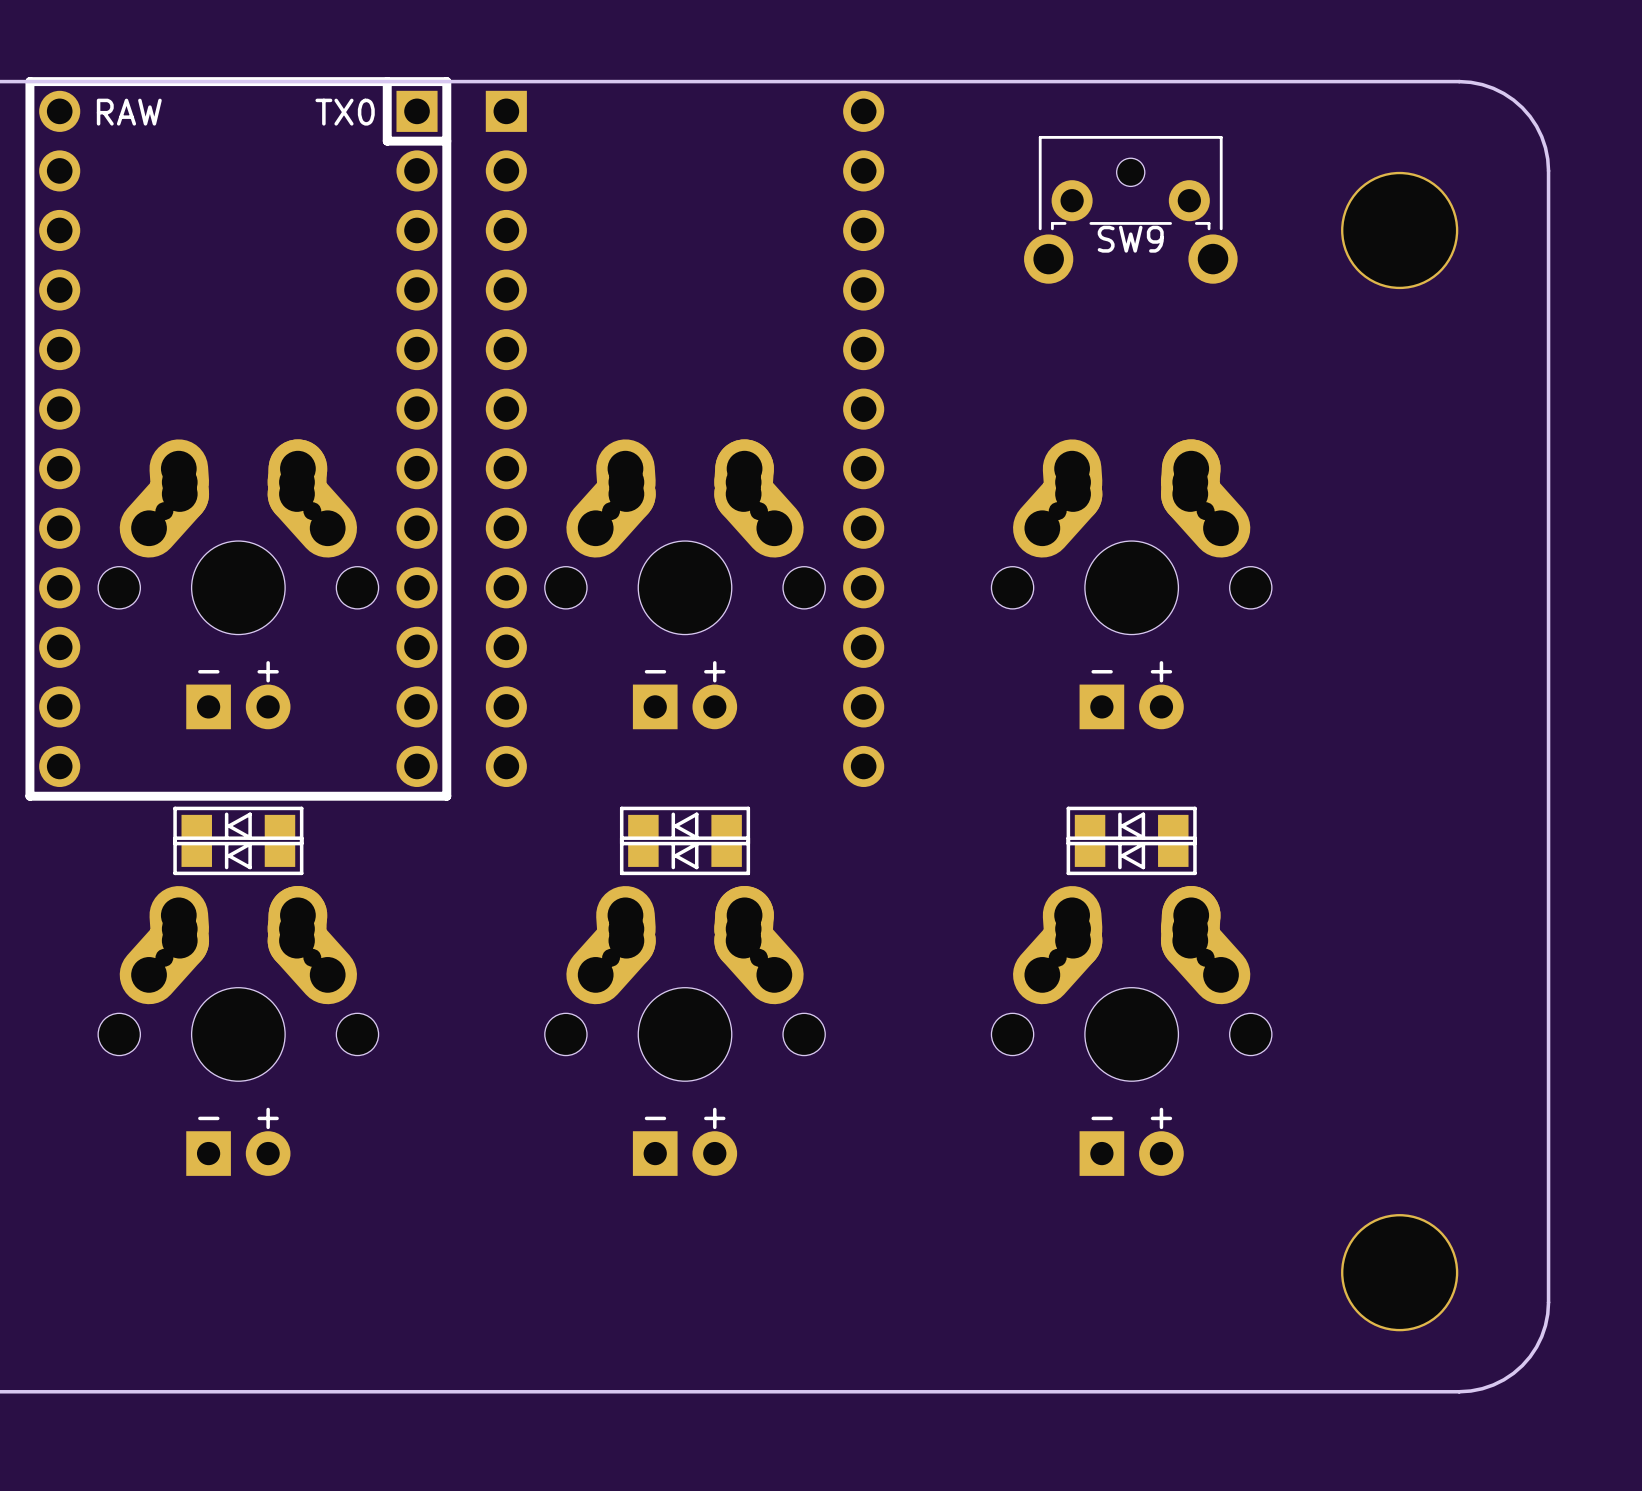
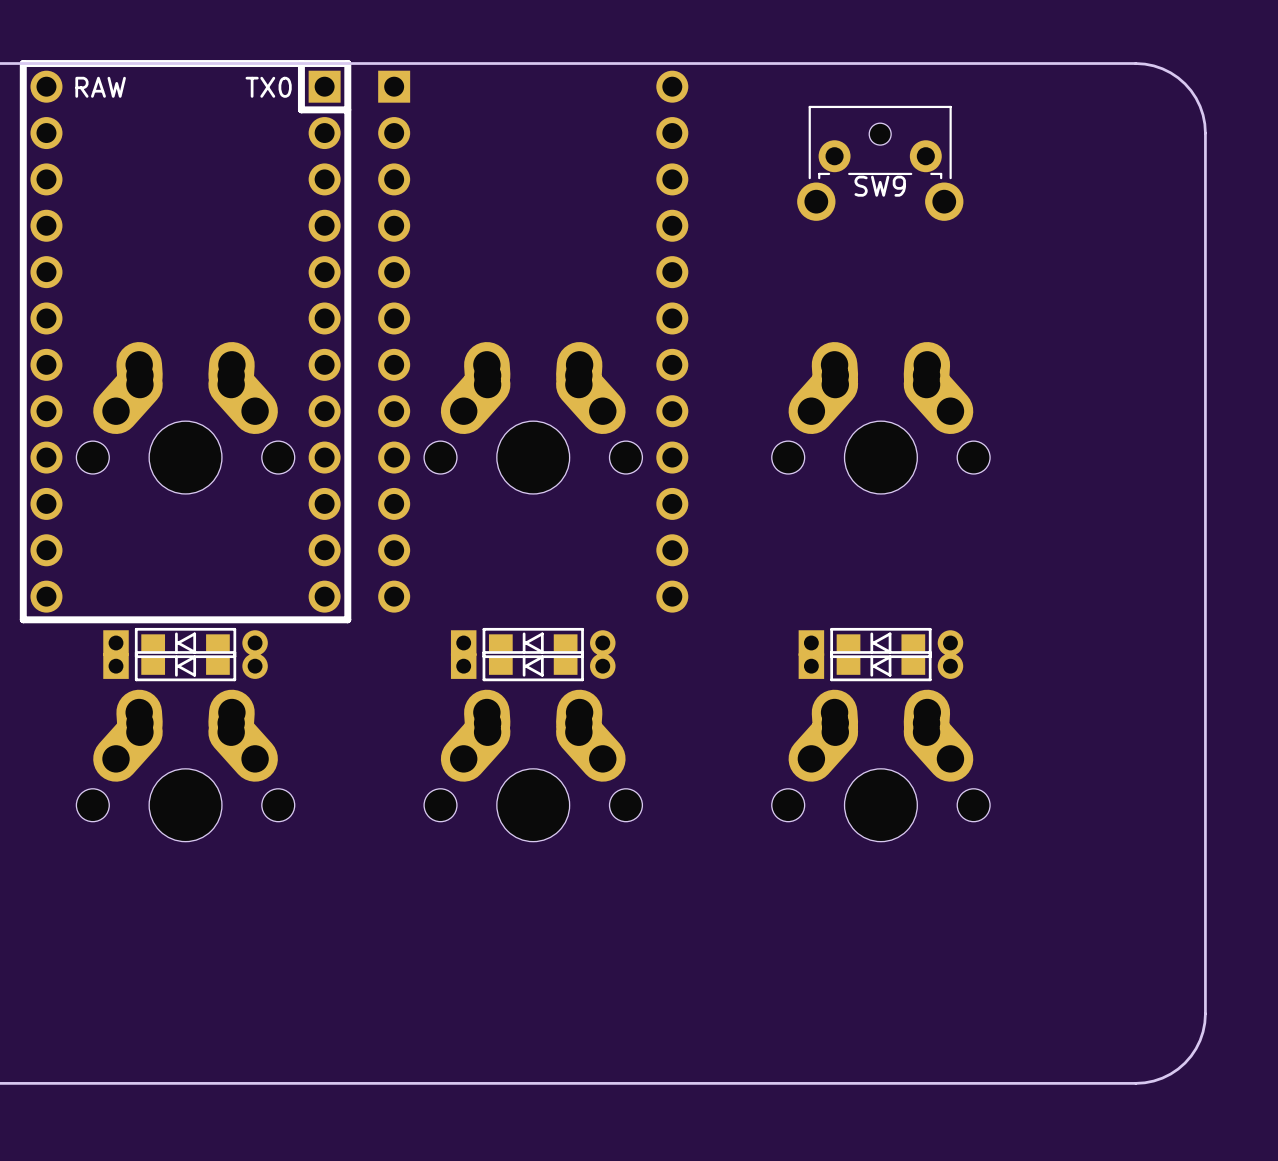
part: (1399, 230) -> none
part: none -> (185, 417)
part: none -> (533, 417)
part: none -> (880, 417)
part: (238, 584) -> none
part: (685, 584) -> none
part: (1131, 584) -> none
part footprint: [173, 806, 304, 846] -> [103, 627, 268, 659]
part footprint: [619, 806, 751, 846] -> [450, 627, 616, 659]
part footprint: [1066, 806, 1197, 846] -> [798, 627, 964, 659]
part footprint: [173, 836, 304, 876] -> [103, 651, 268, 682]
part footprint: [619, 836, 751, 876] -> [450, 651, 616, 682]
part footprint: [1066, 836, 1197, 876] -> [798, 651, 964, 682]
part: none -> (185, 765)
part: none -> (533, 765)
part: none -> (880, 765)
part: (238, 1030) -> none
part: (685, 1030) -> none
part: (1131, 1030) -> none
part: (1399, 1272) -> none

